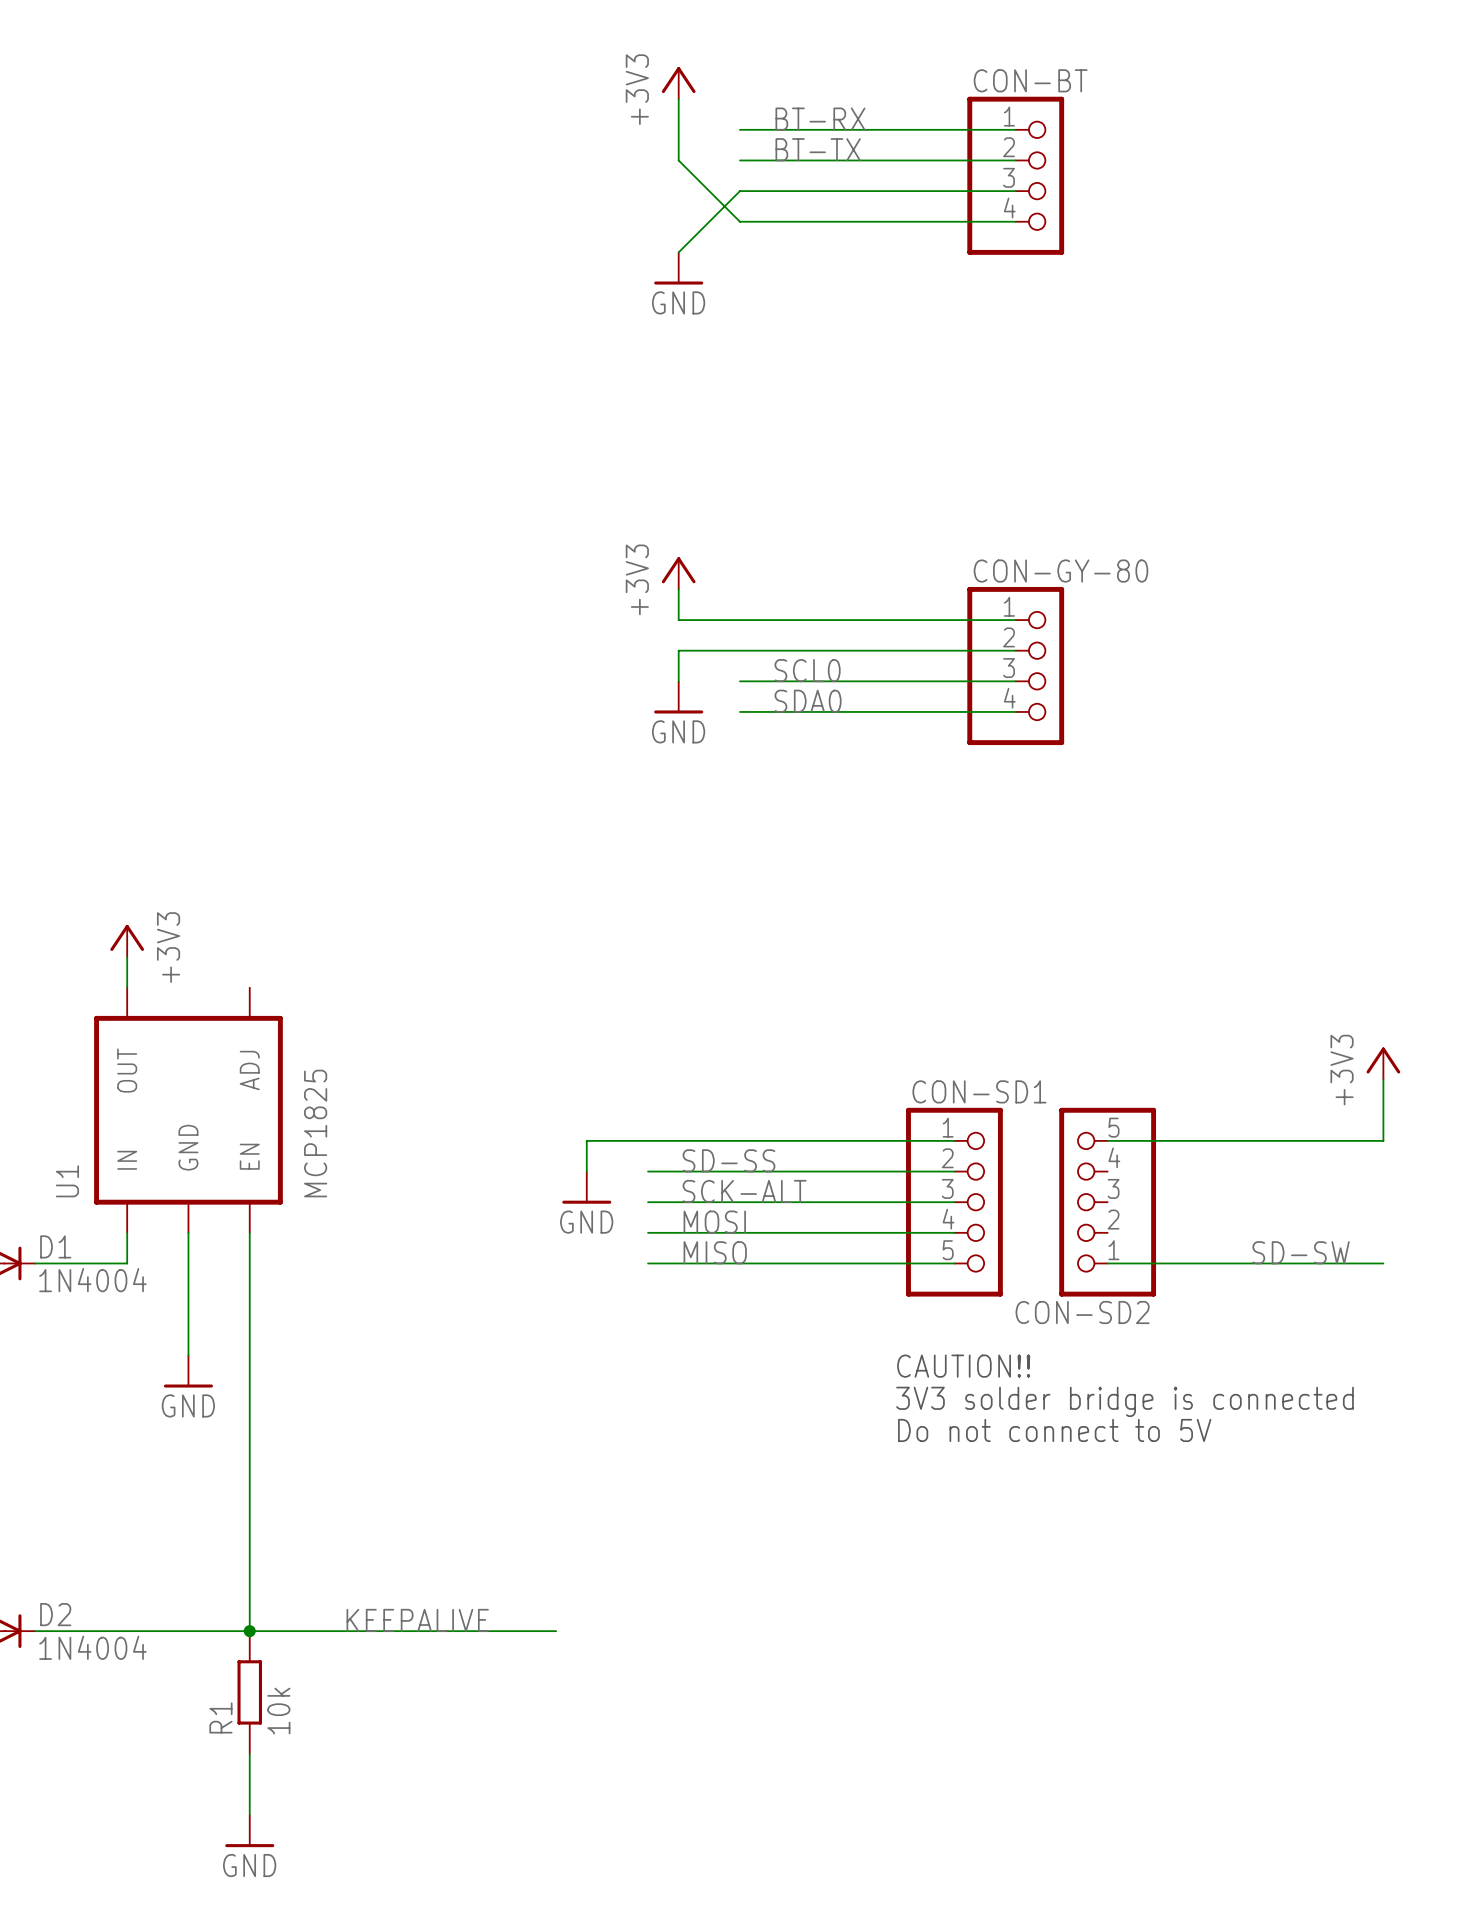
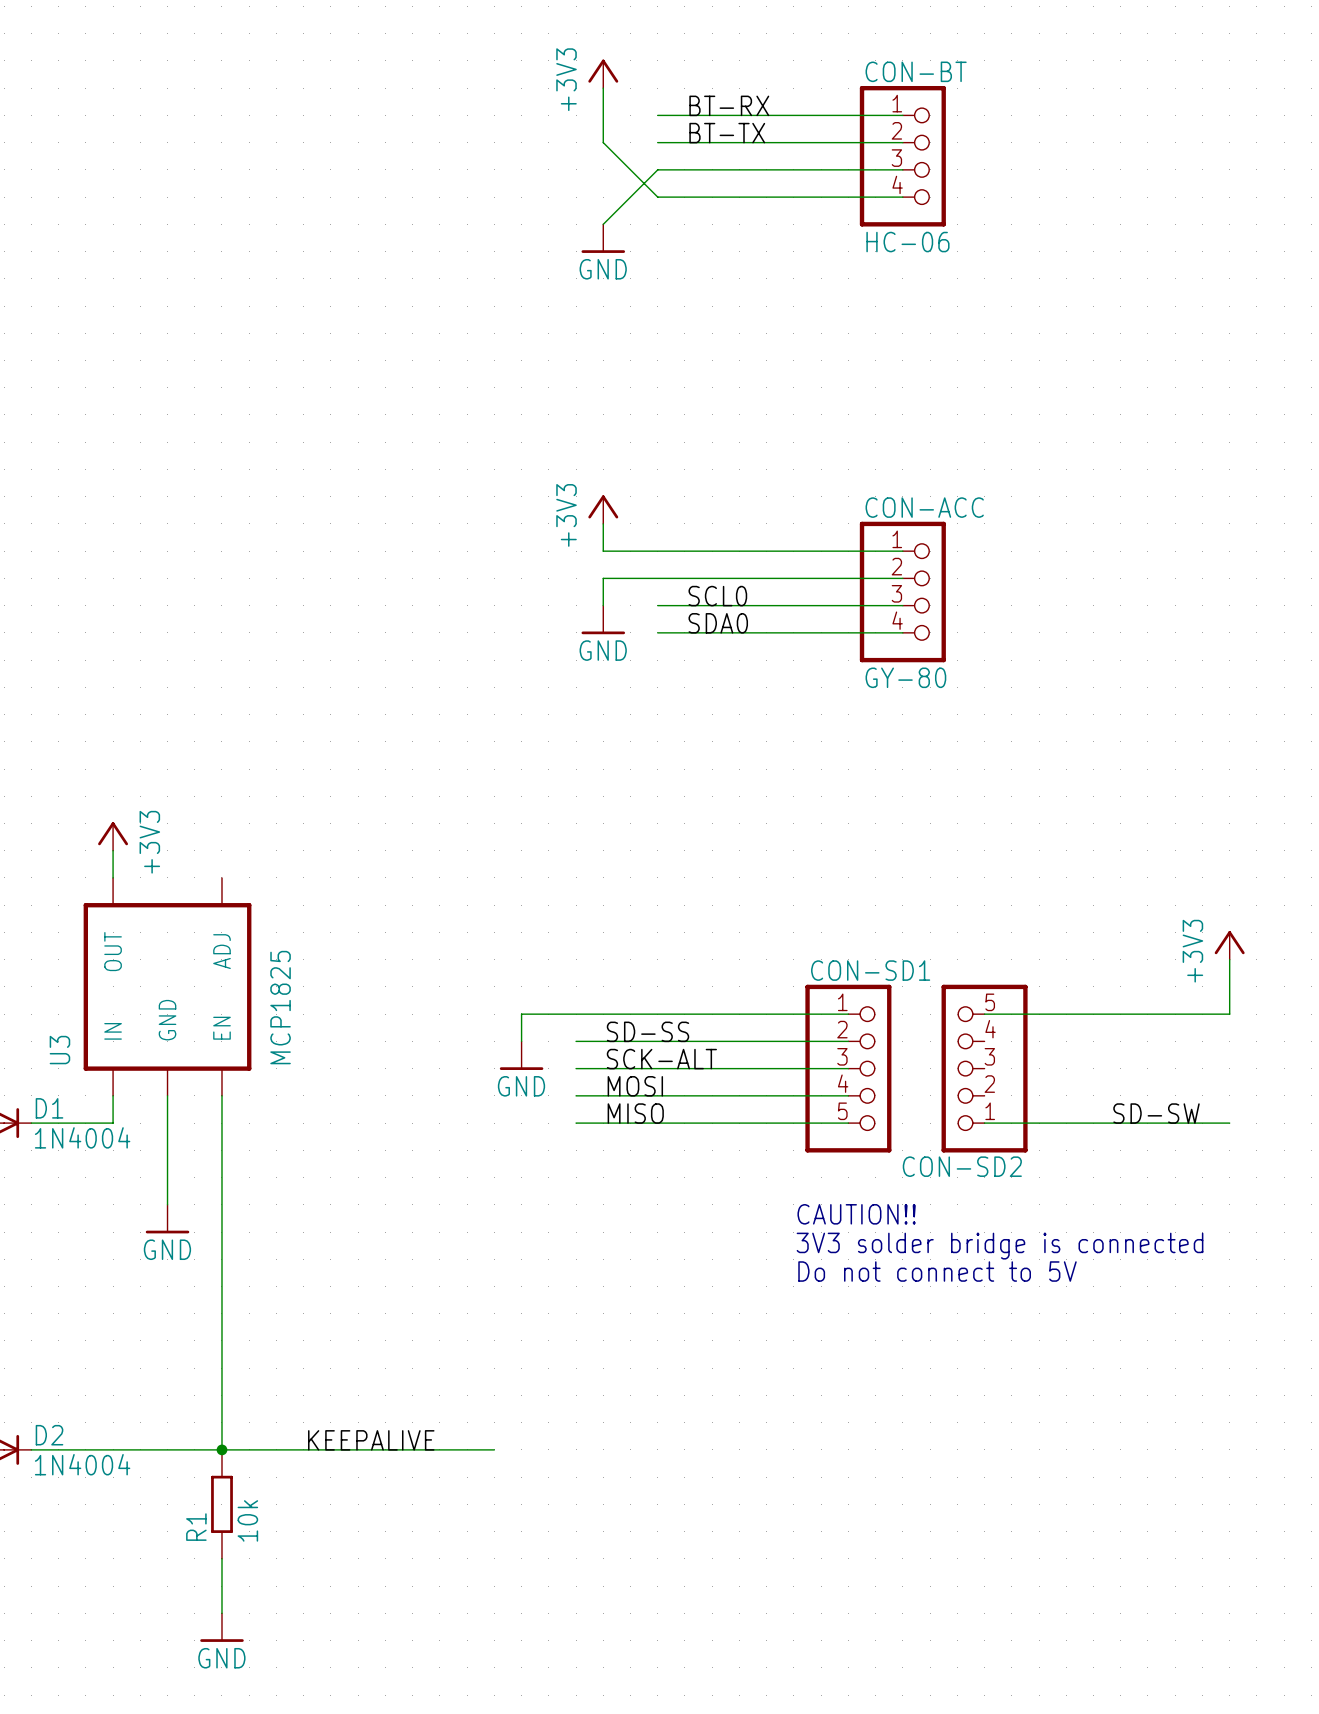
CON-BT value: none -> HC-06 (907, 242)
CON-GY-80 name: CON-GY-80 (1060, 571) -> CON-ACC (924, 507)
CON-GY-80 value: none -> GY-80 (905, 677)
U1 name: U1 (67, 1181) -> U3 (59, 1050)

